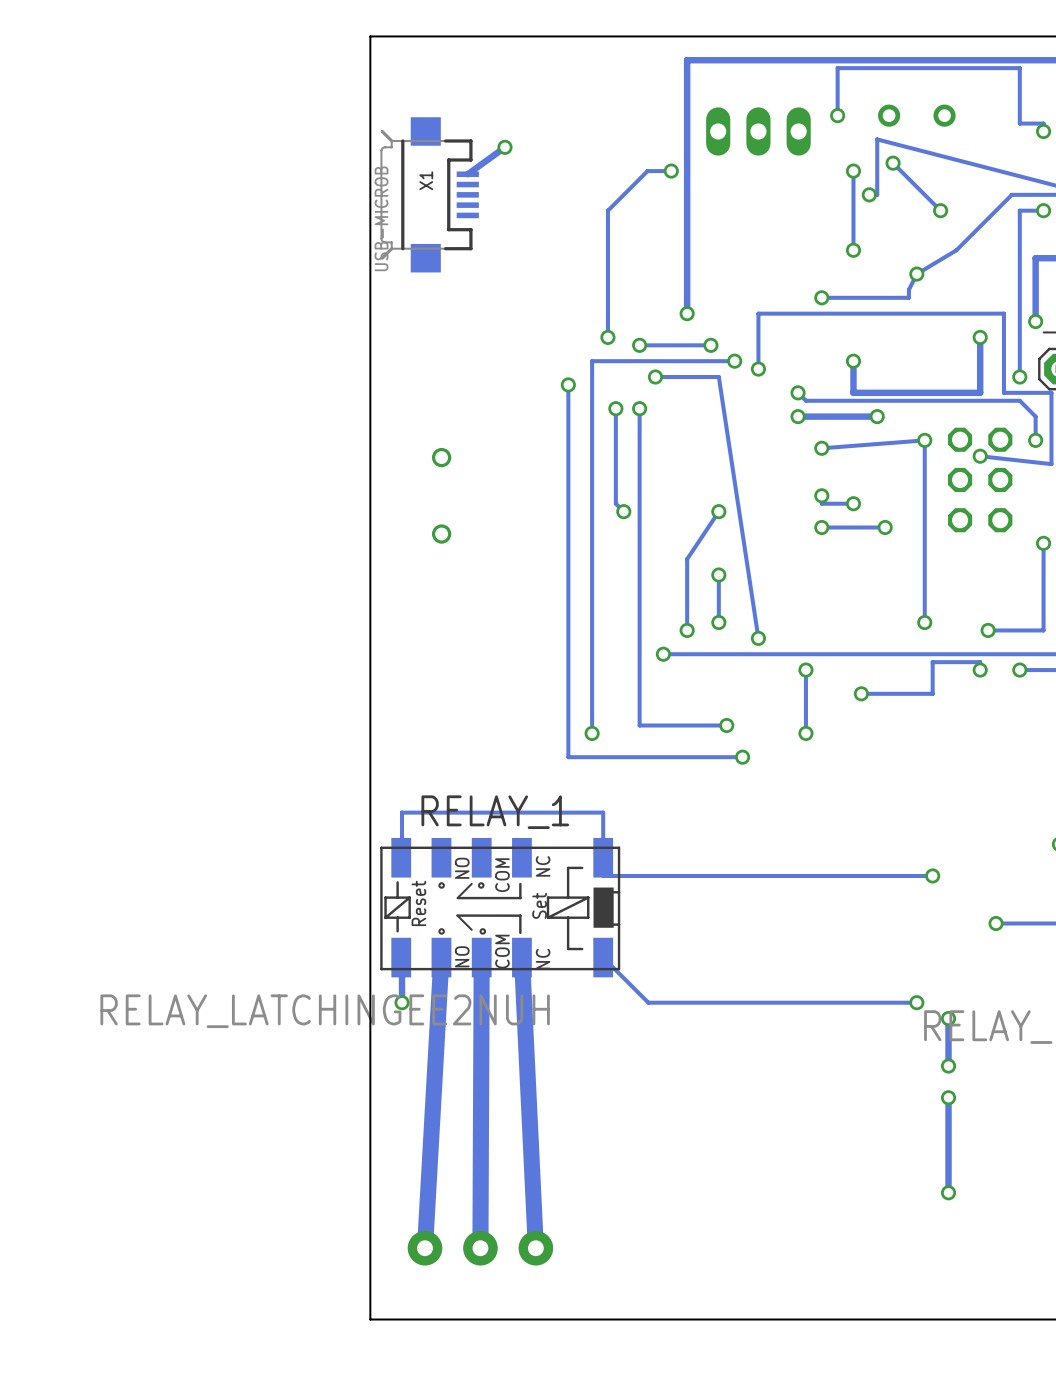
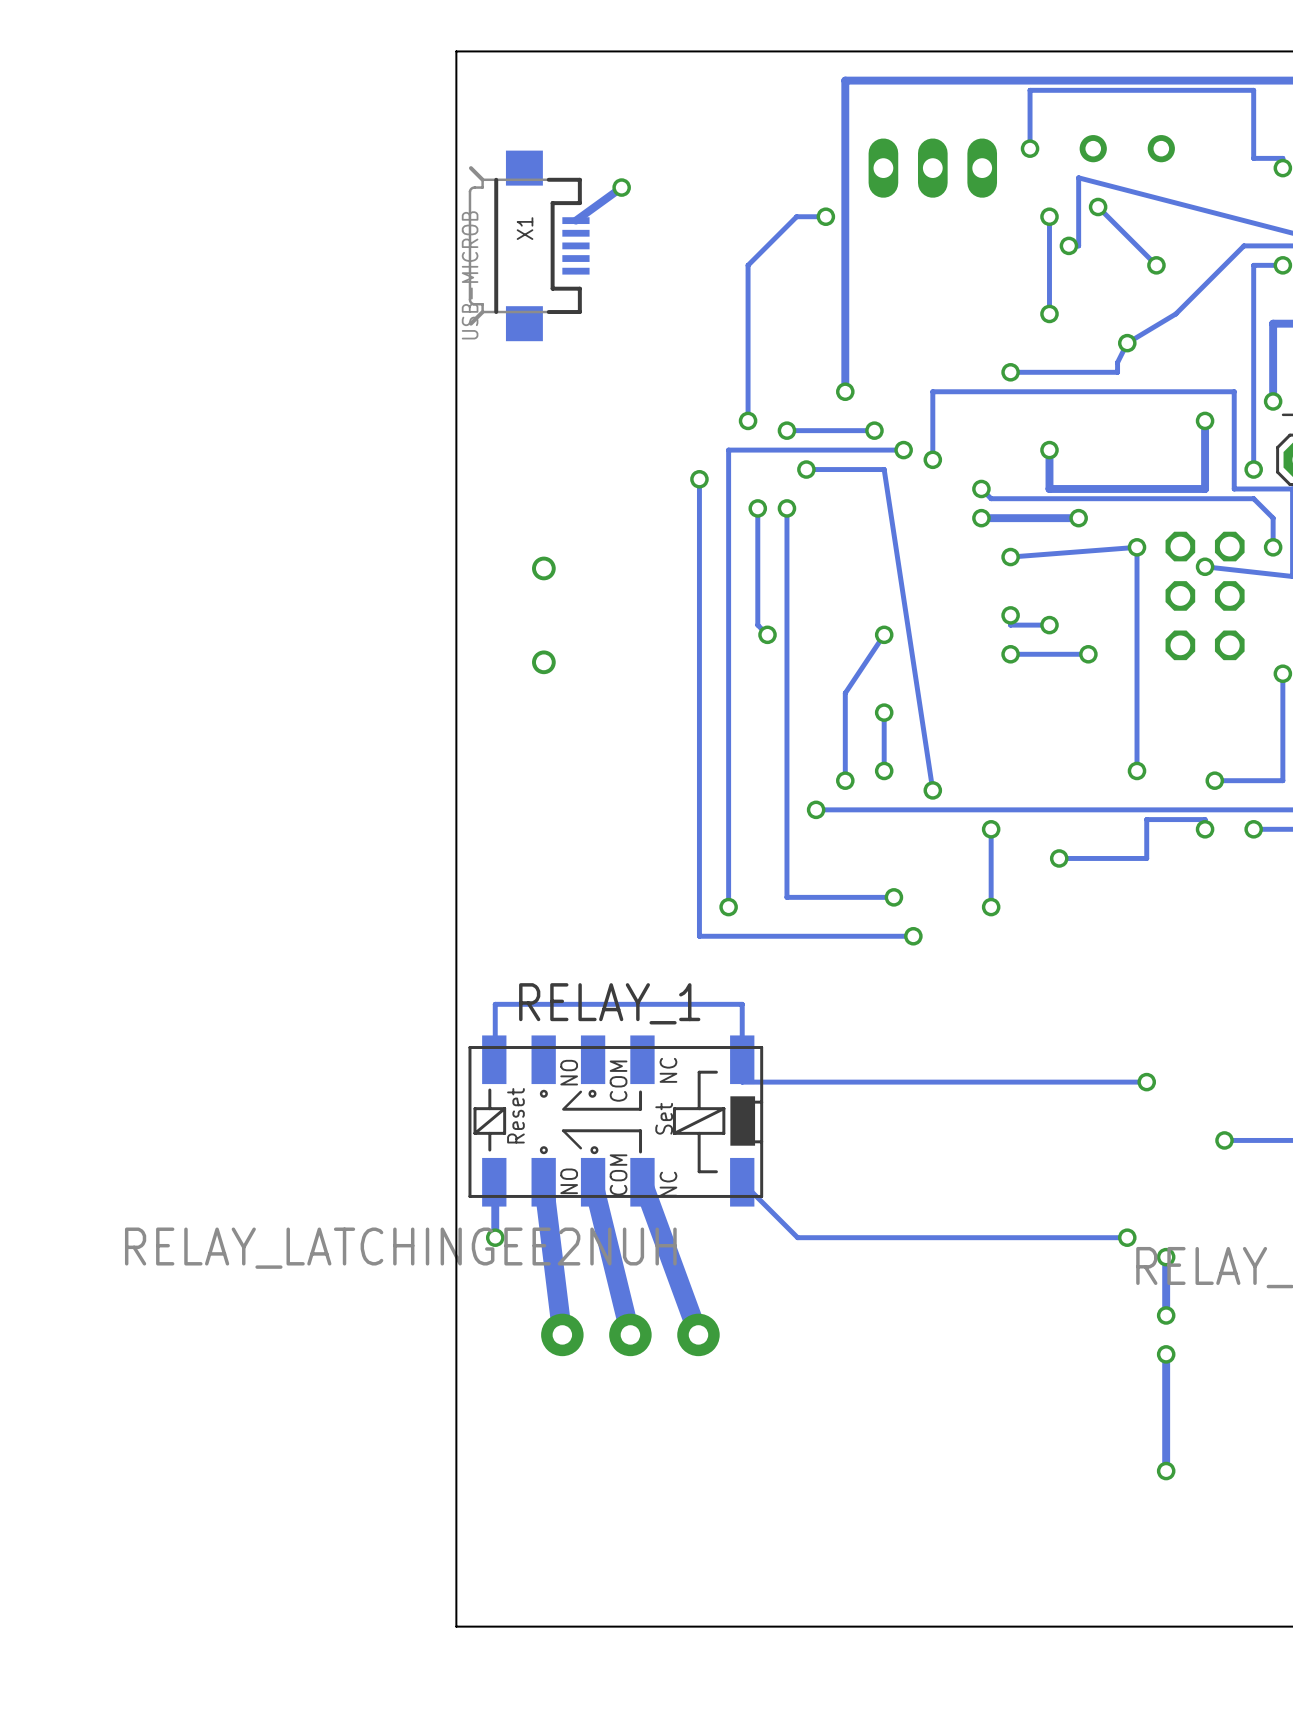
track: (441, 957) (424, 1248) -> (543, 1182) (562, 1334)
track: (481, 957) (480, 1248) -> (593, 1182) (630, 1334)
track: (521, 957) (535, 1248) -> (642, 1182) (698, 1334)
part position: (480, 1248) -> (630, 1334)

